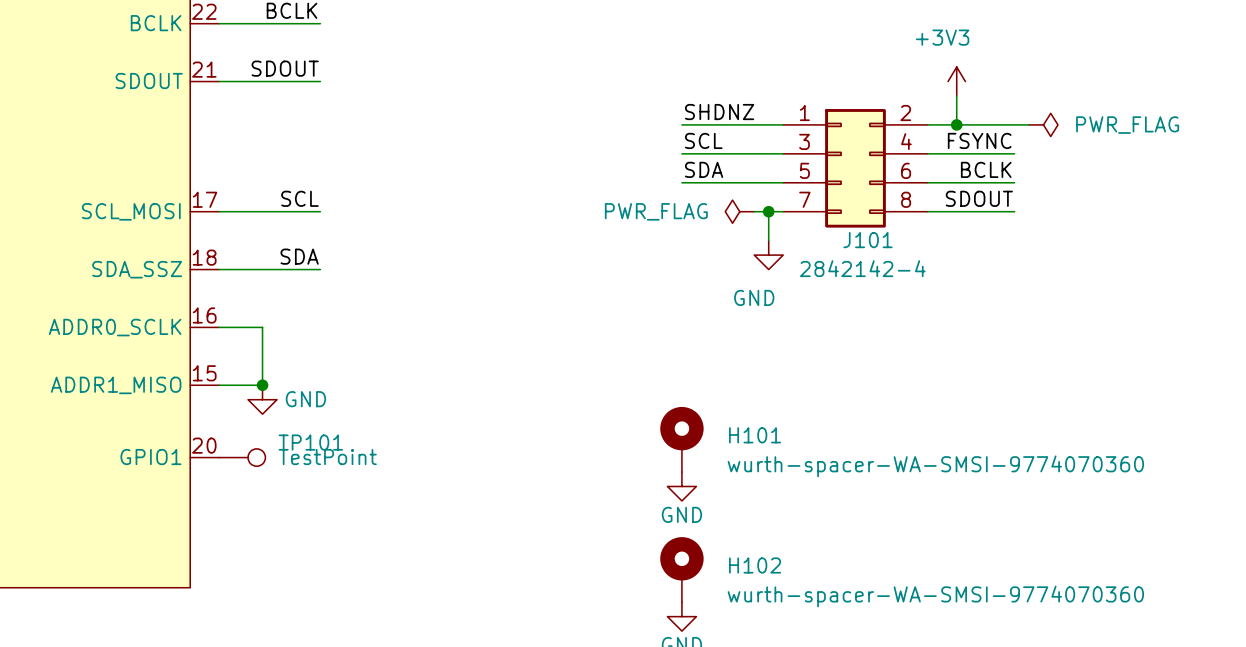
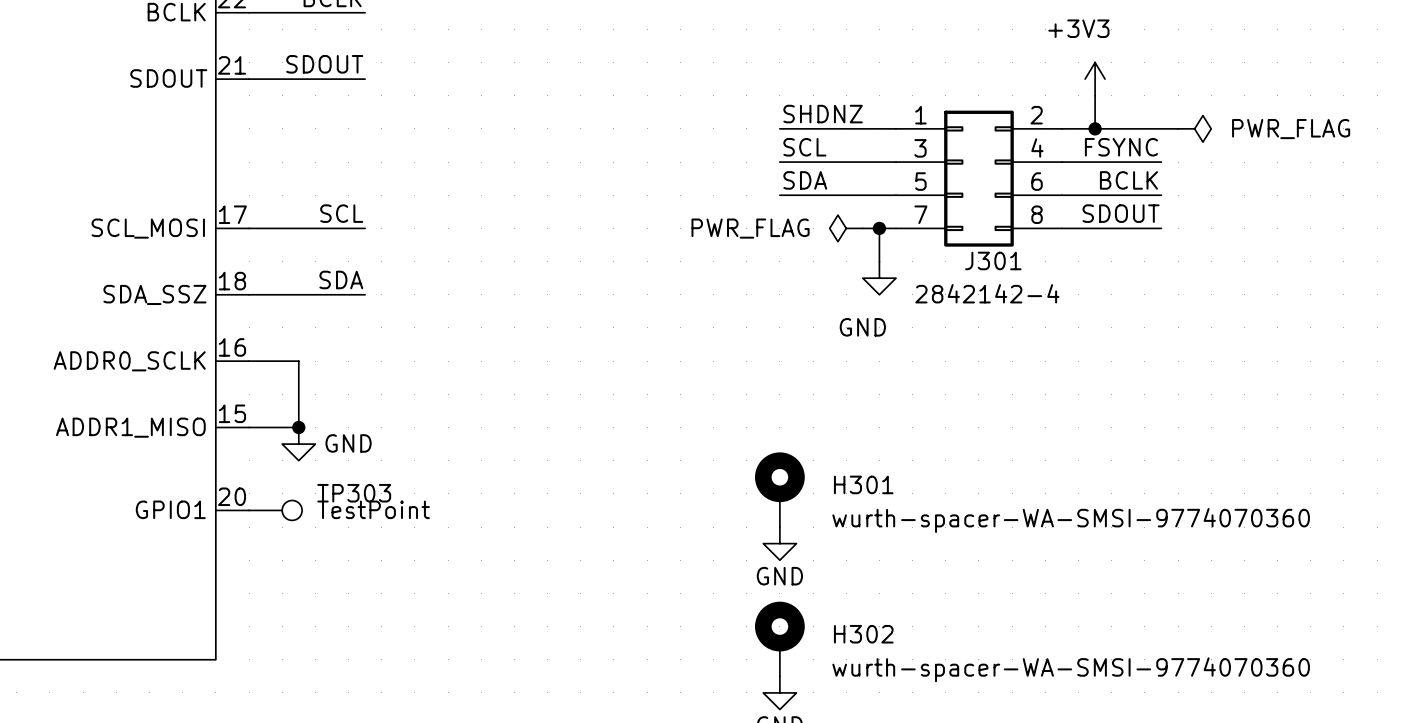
J101 name: J101 (867, 240) -> J301 (993, 260)
H101 name: H101 (755, 435) -> H301 (863, 484)
TP101 name: TP101 (310, 442) -> TP303 (354, 493)
H102 name: H102 (755, 565) -> H302 (863, 634)

